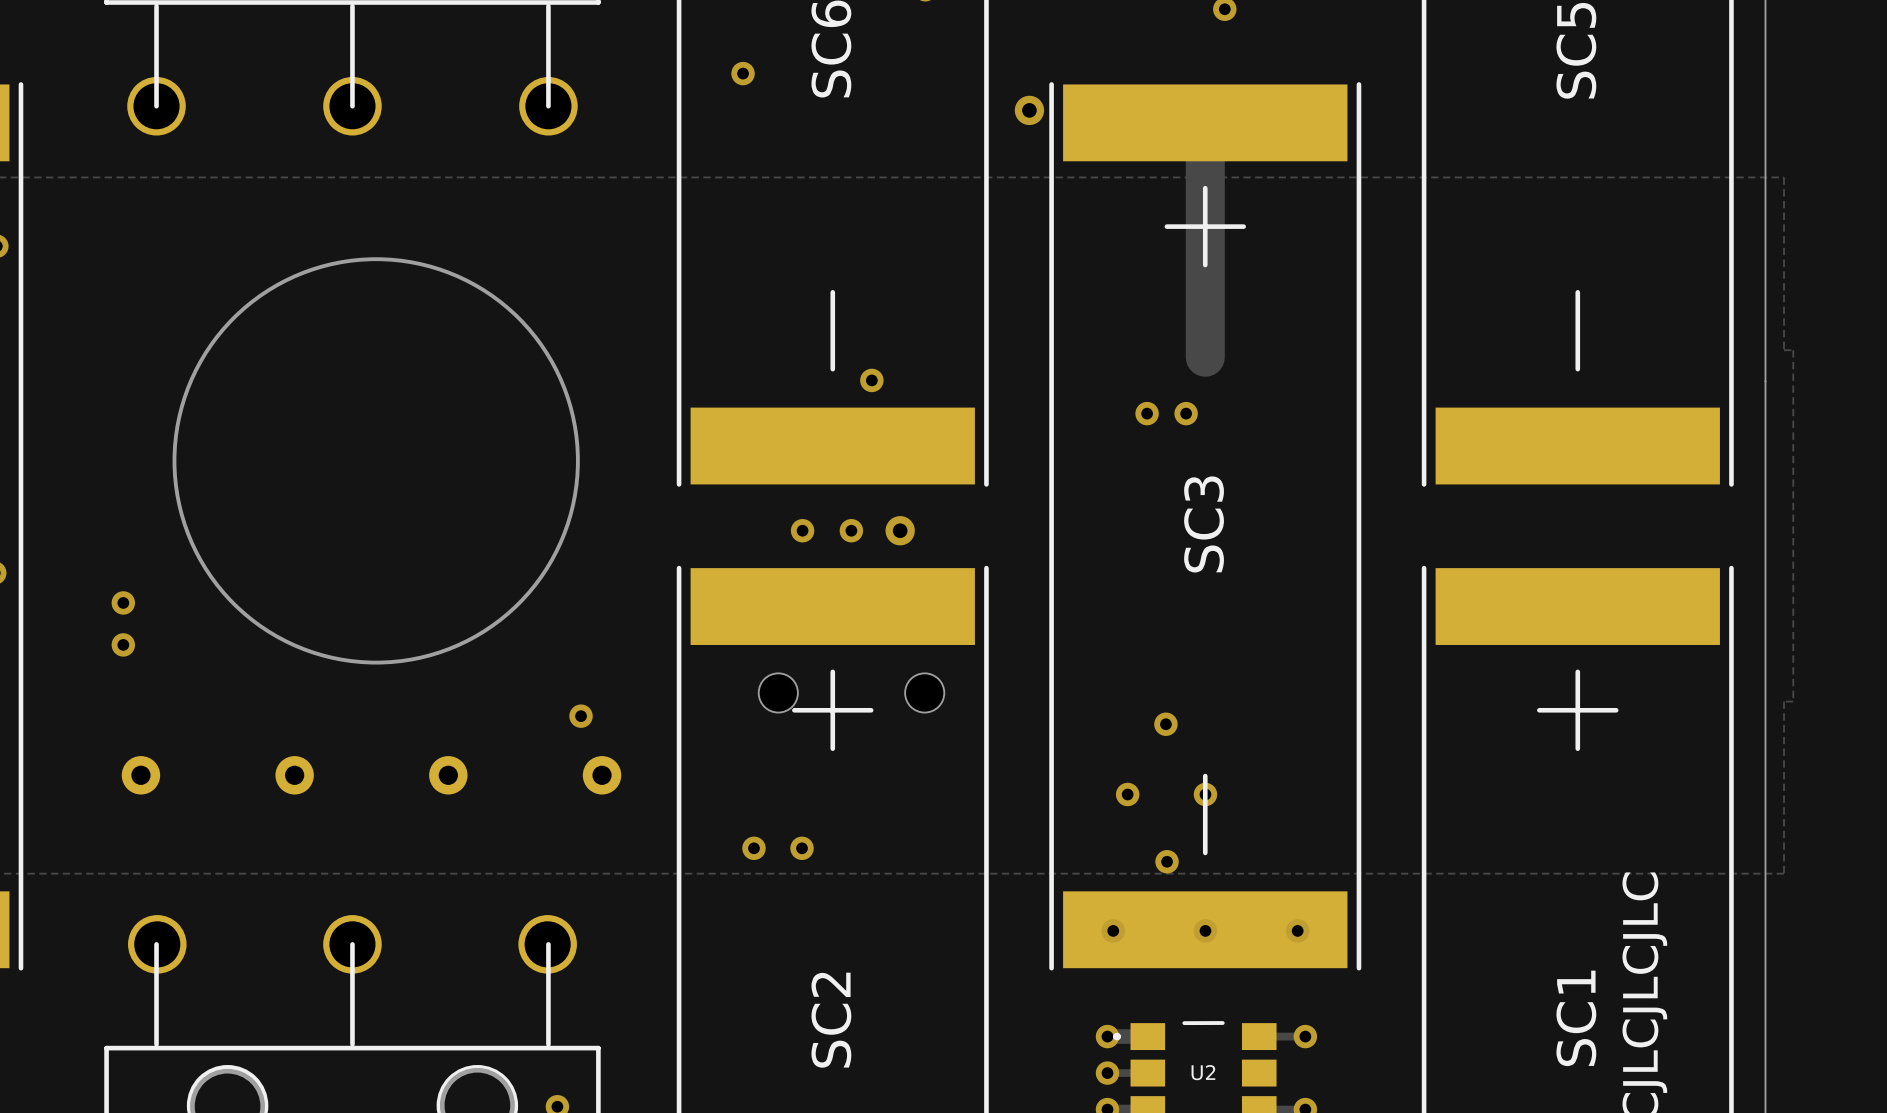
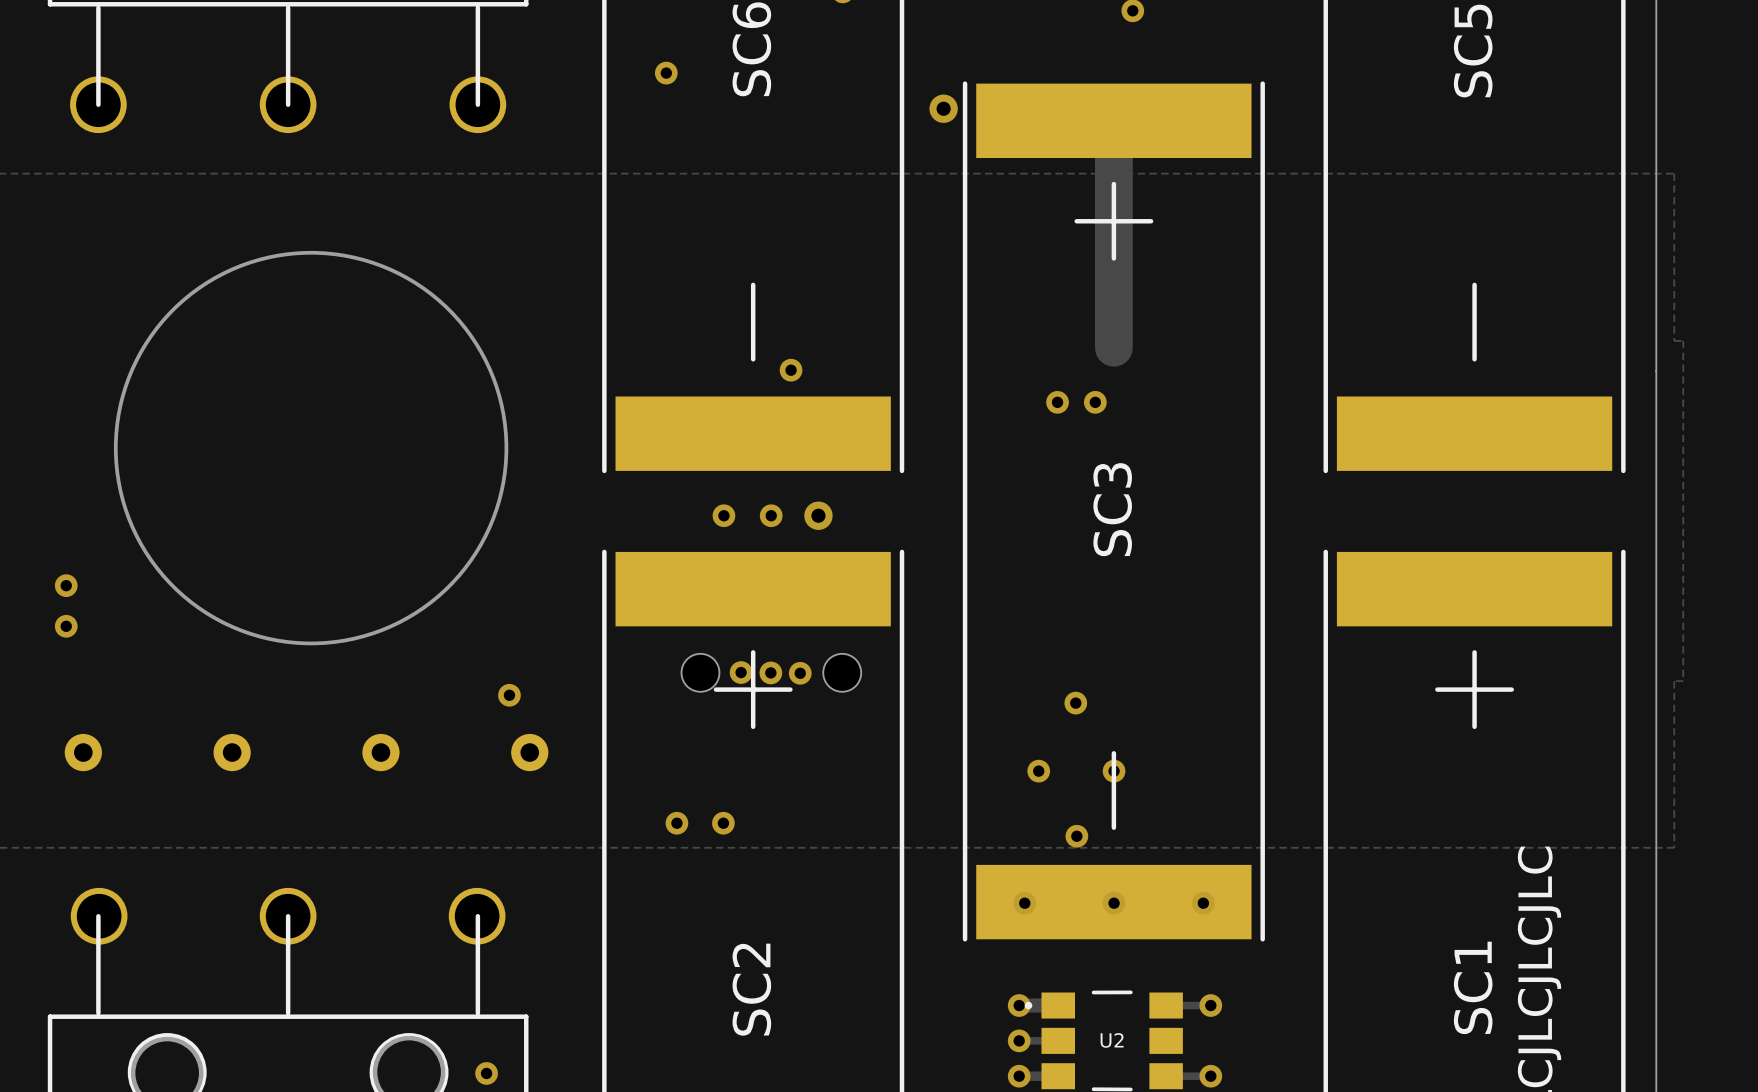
via: none -> (741, 672)
via: none -> (770, 672)
via: none -> (800, 673)

